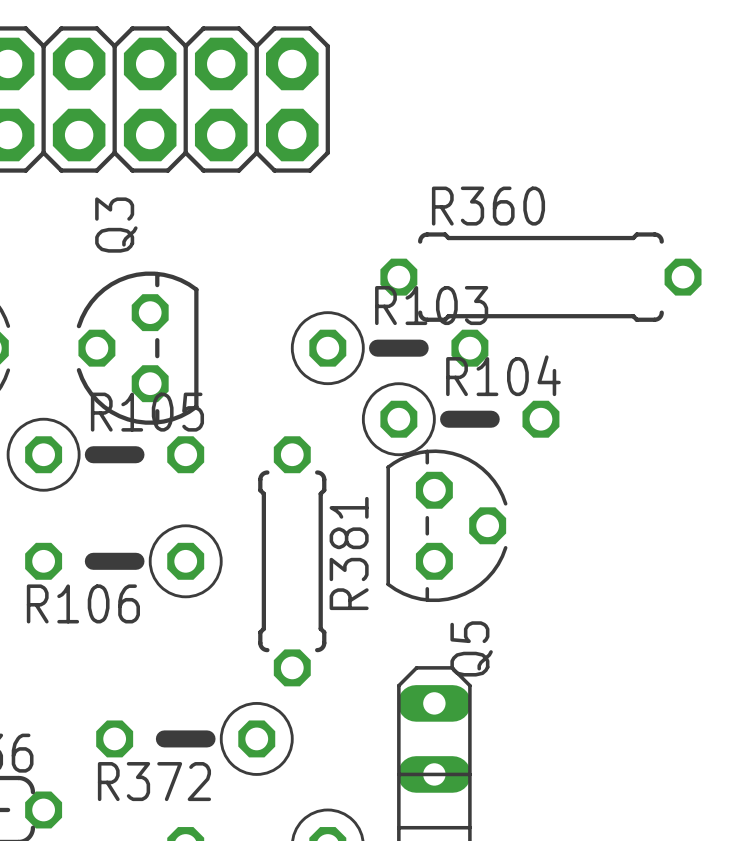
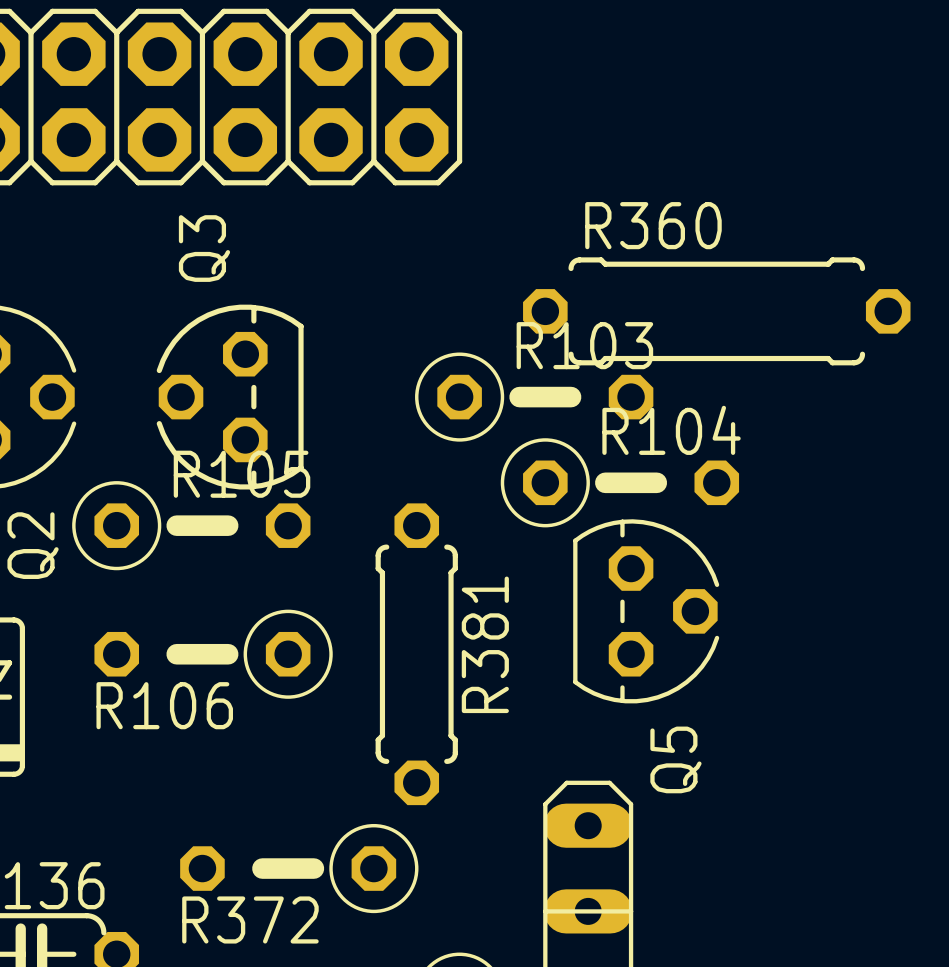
Q5 position: (446, 525) -> (646, 611)

